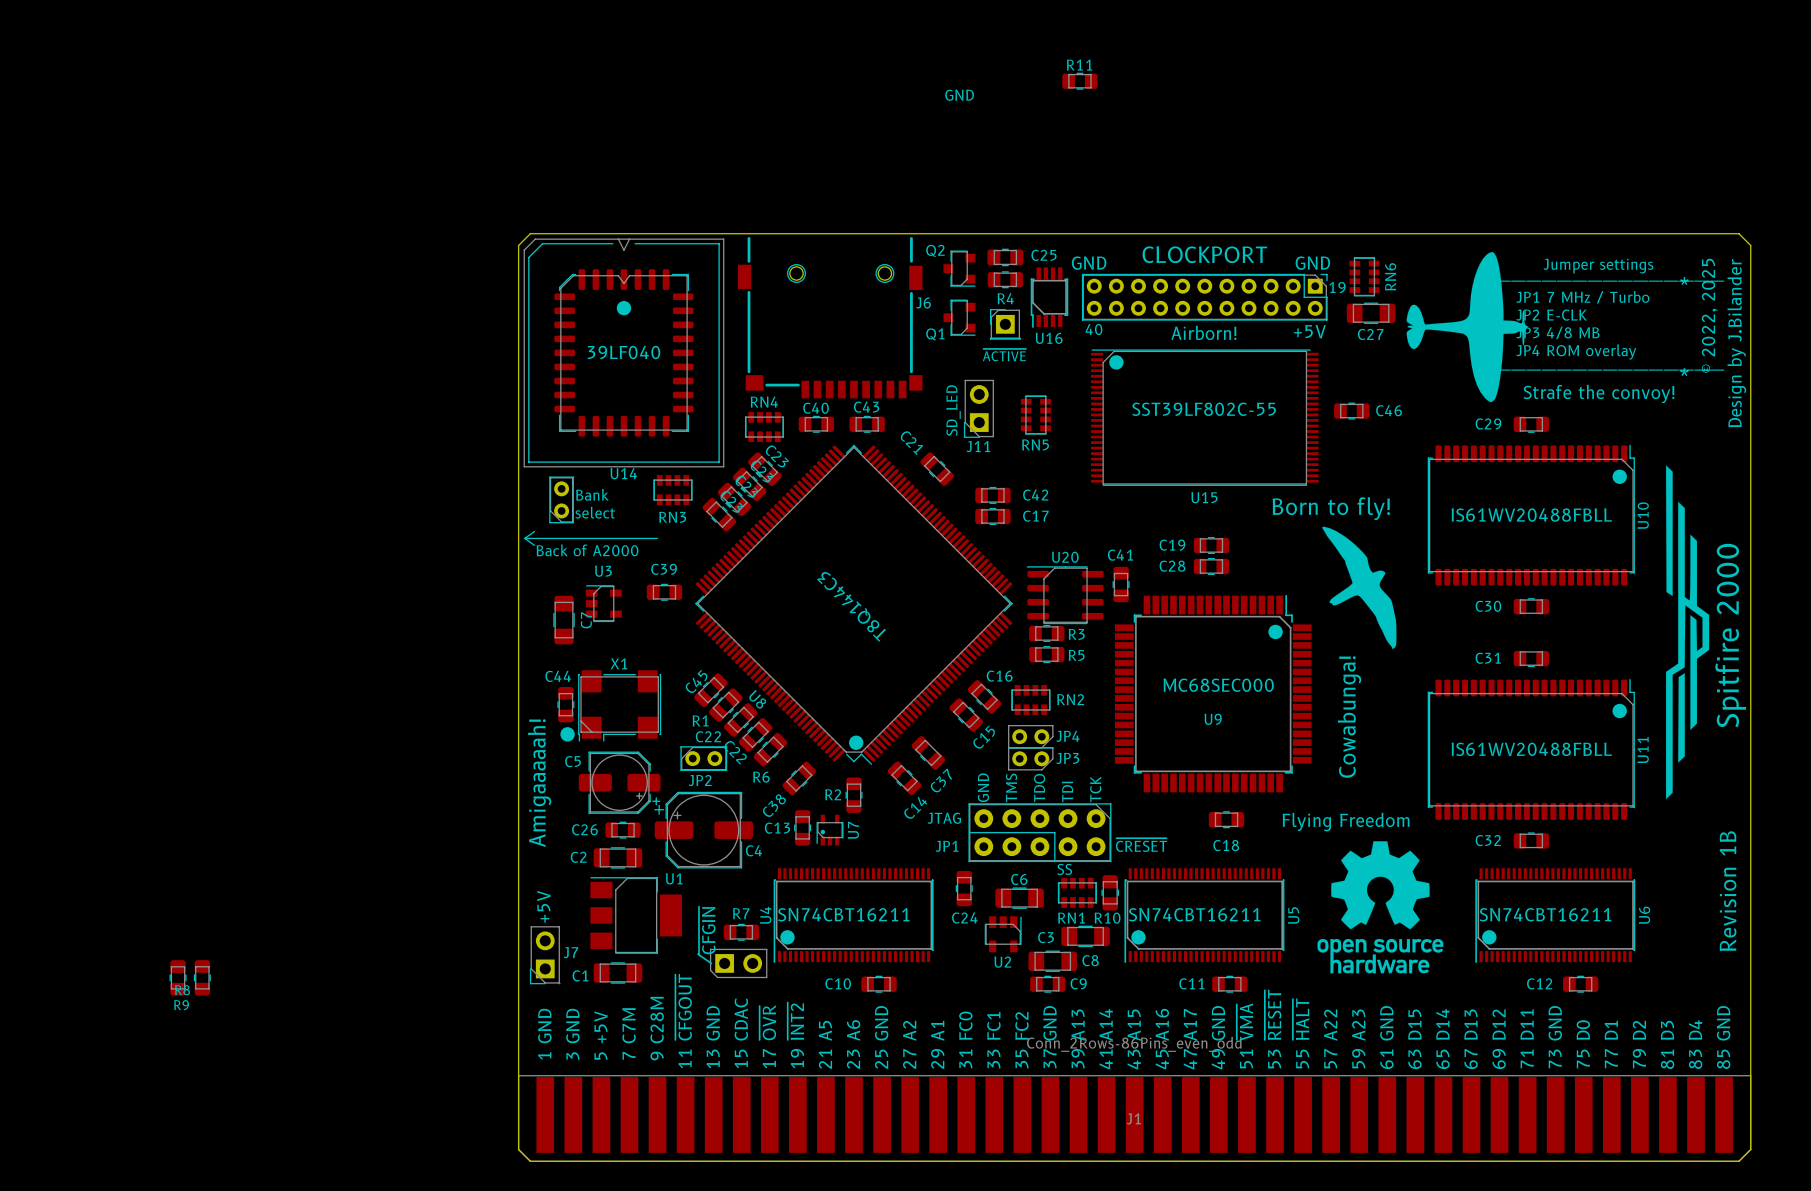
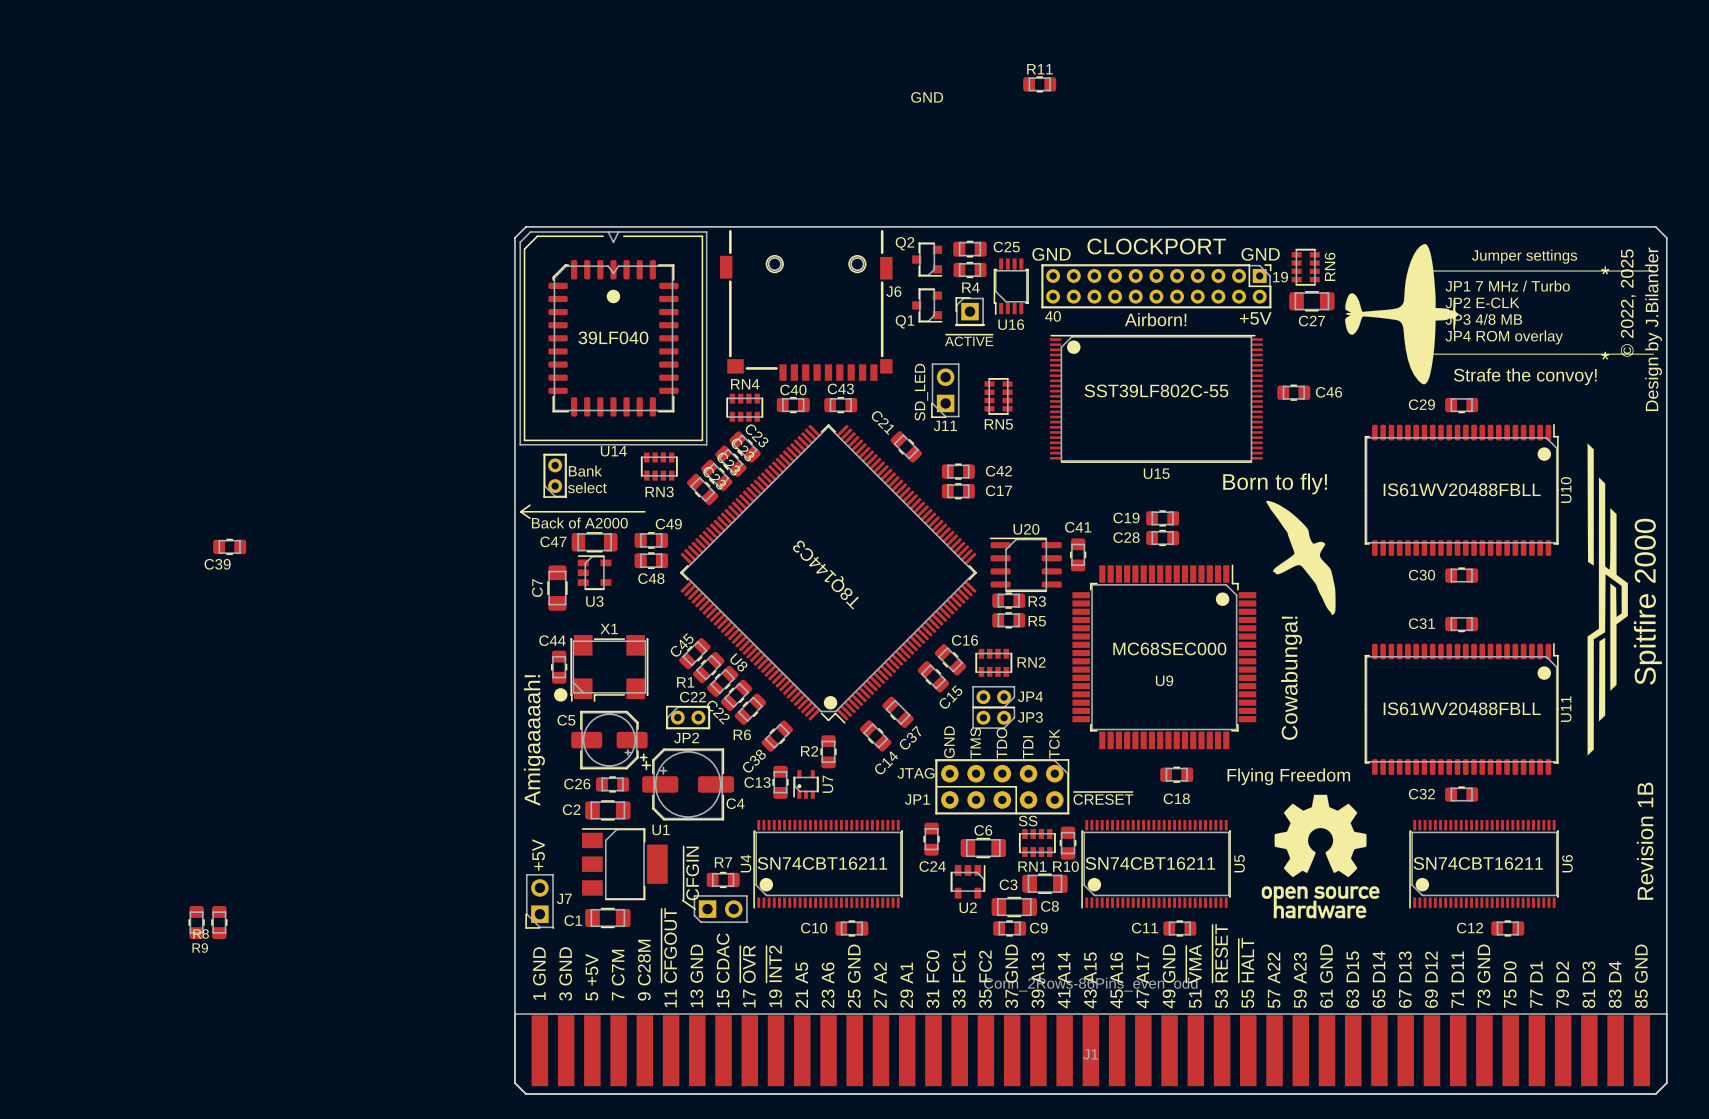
C39 name position: C39 (664, 569) -> C39 (217, 564)
C49: none -> (651, 540)
U3 name position: U3 (603, 571) -> U3 (594, 601)
C47: none -> (594, 542)
C48: none -> (651, 560)
C39 position: (664, 592) -> (229, 546)
C7 name position: C7 (586, 620) -> C7 (537, 588)

